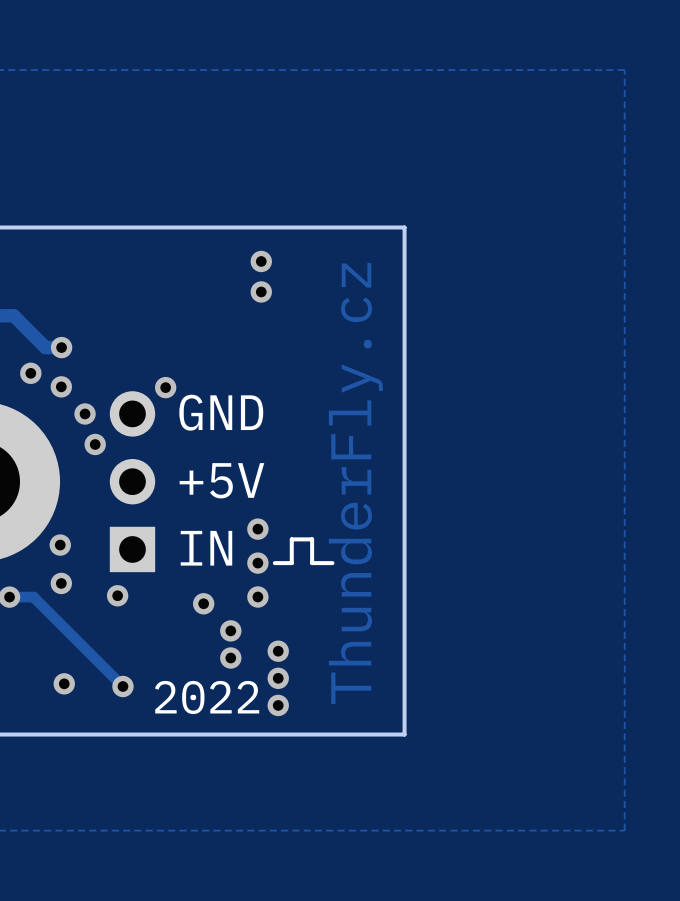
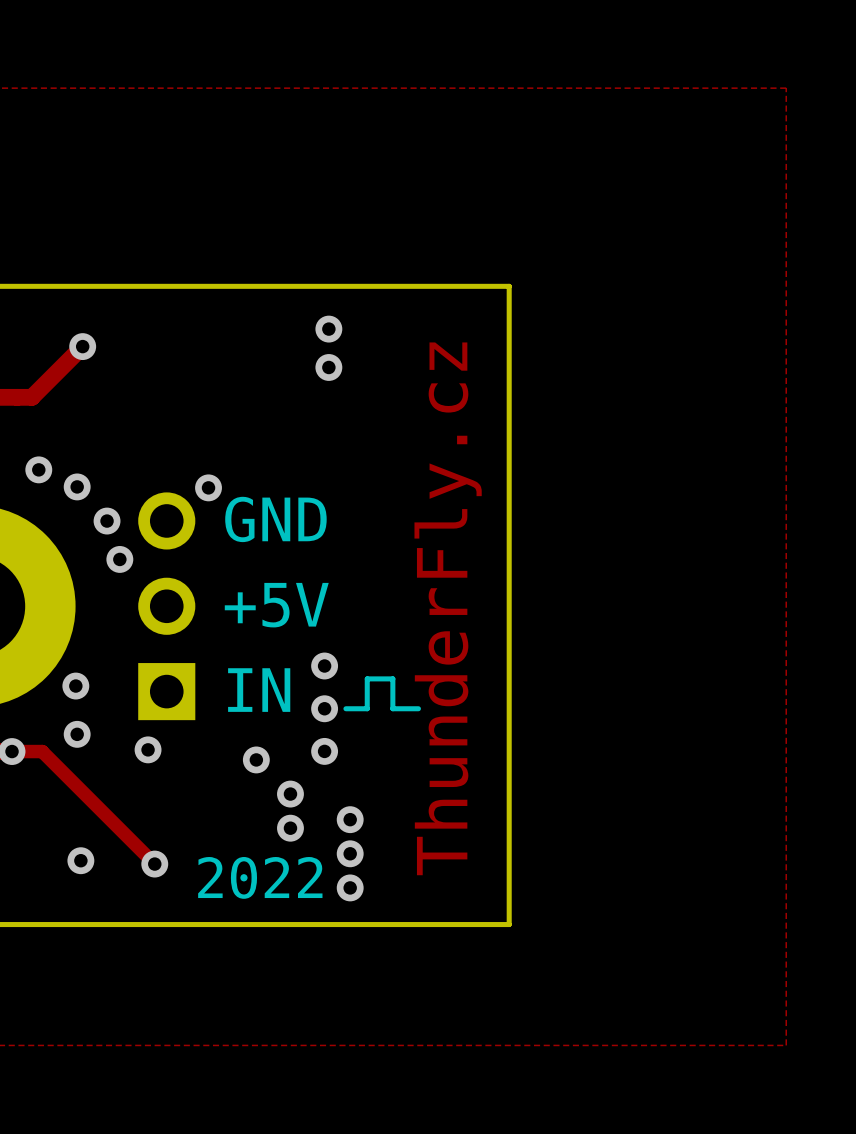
track: (13, 315) (45, 347) (61, 347) -> (17, 397) (31, 397) (82, 346)
via position: (61, 347) -> (82, 346)

